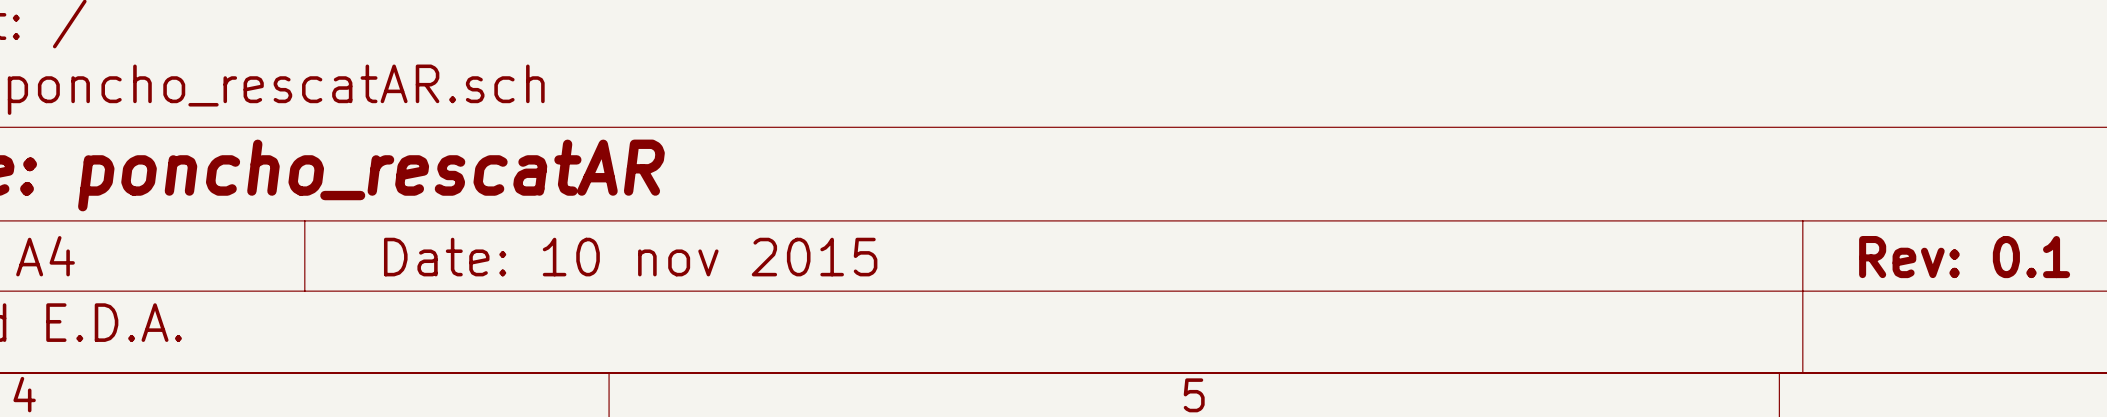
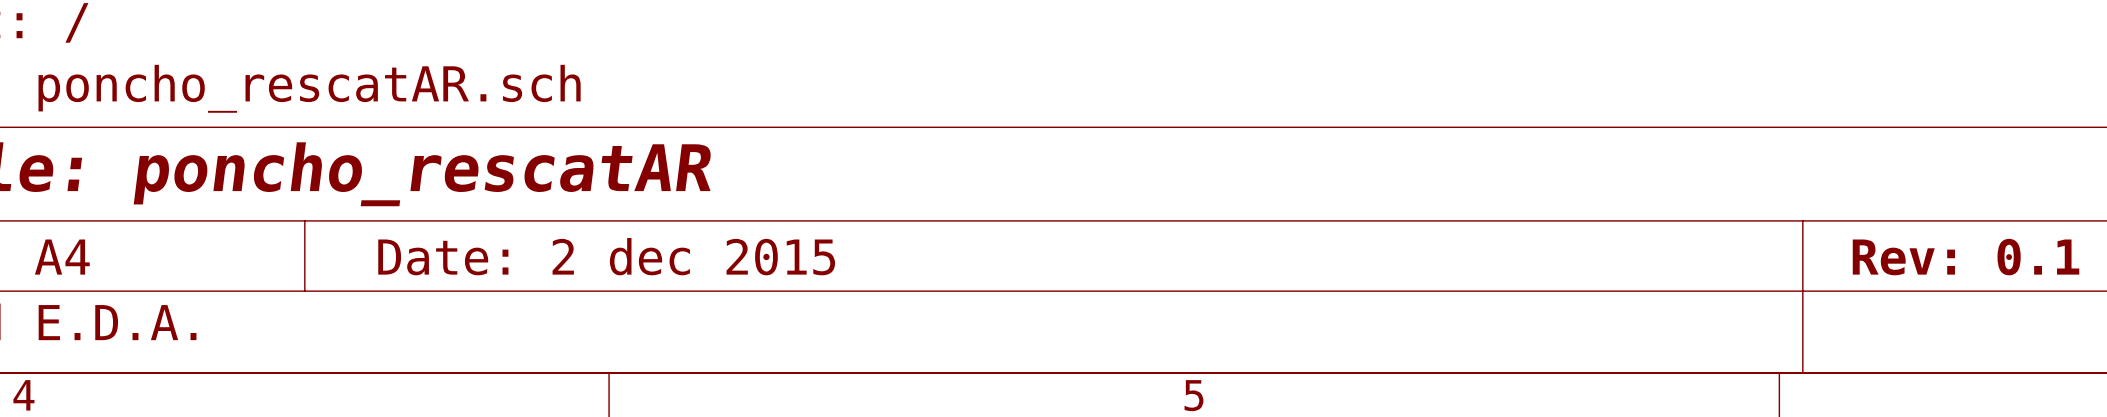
title block: Date: 10 nov 2015 (630, 257) -> Date: 2 dec 2015 (606, 256)

